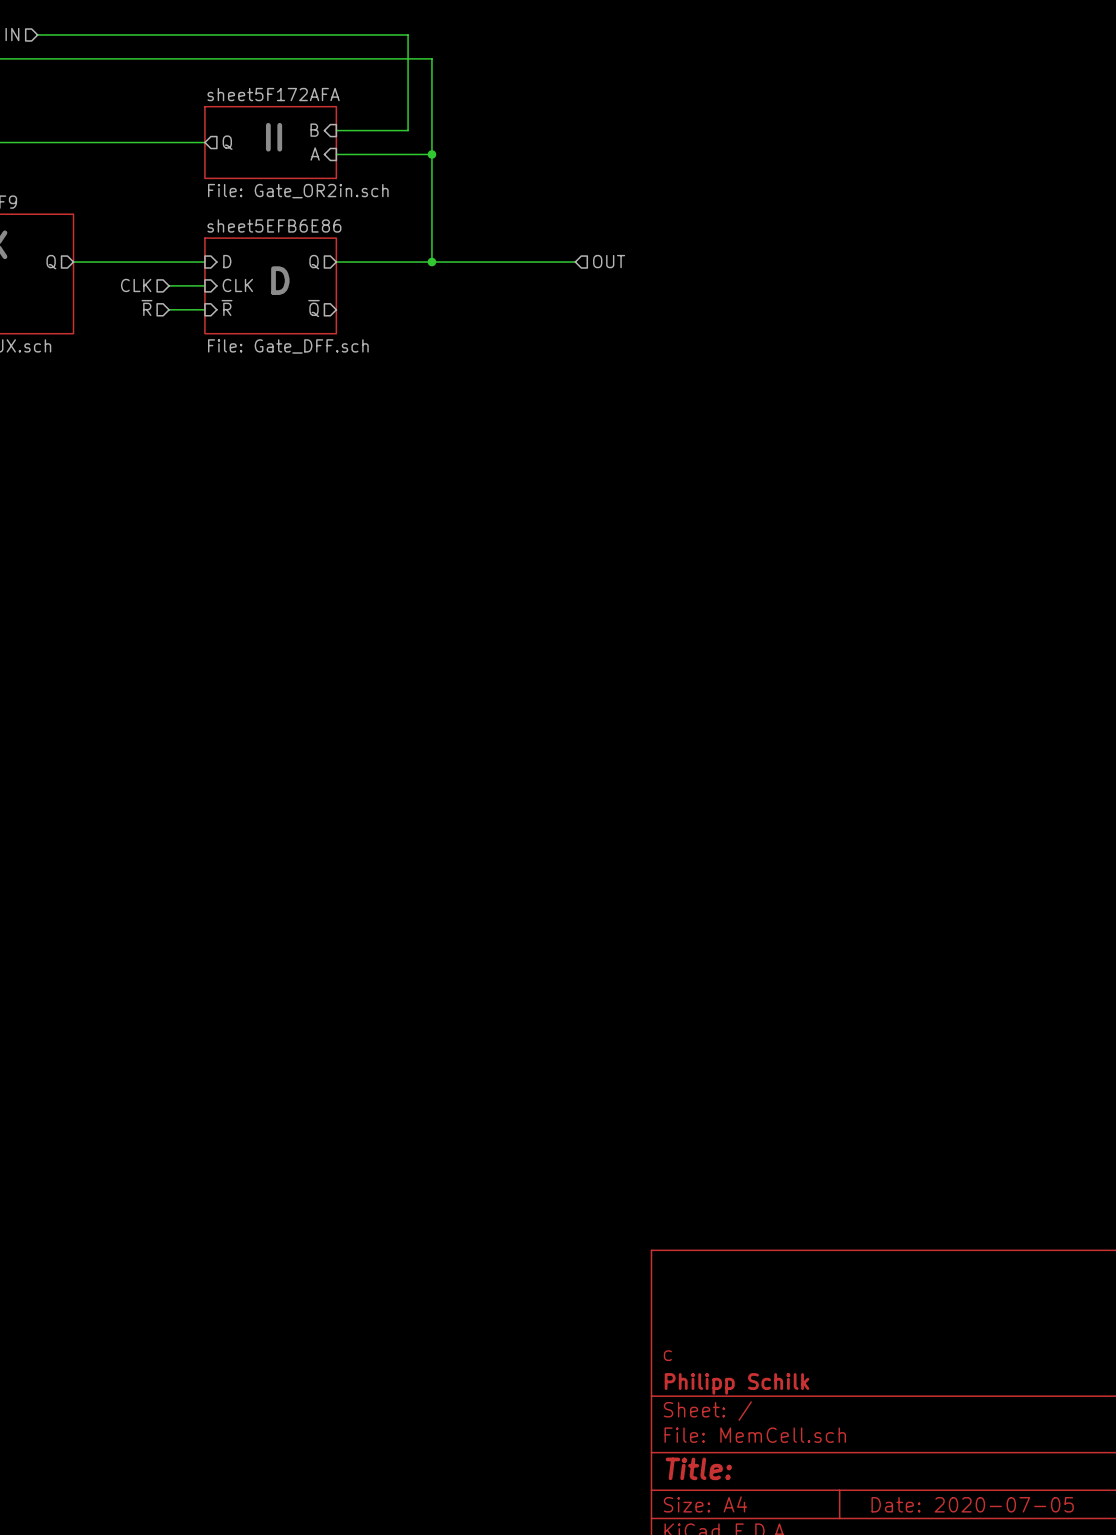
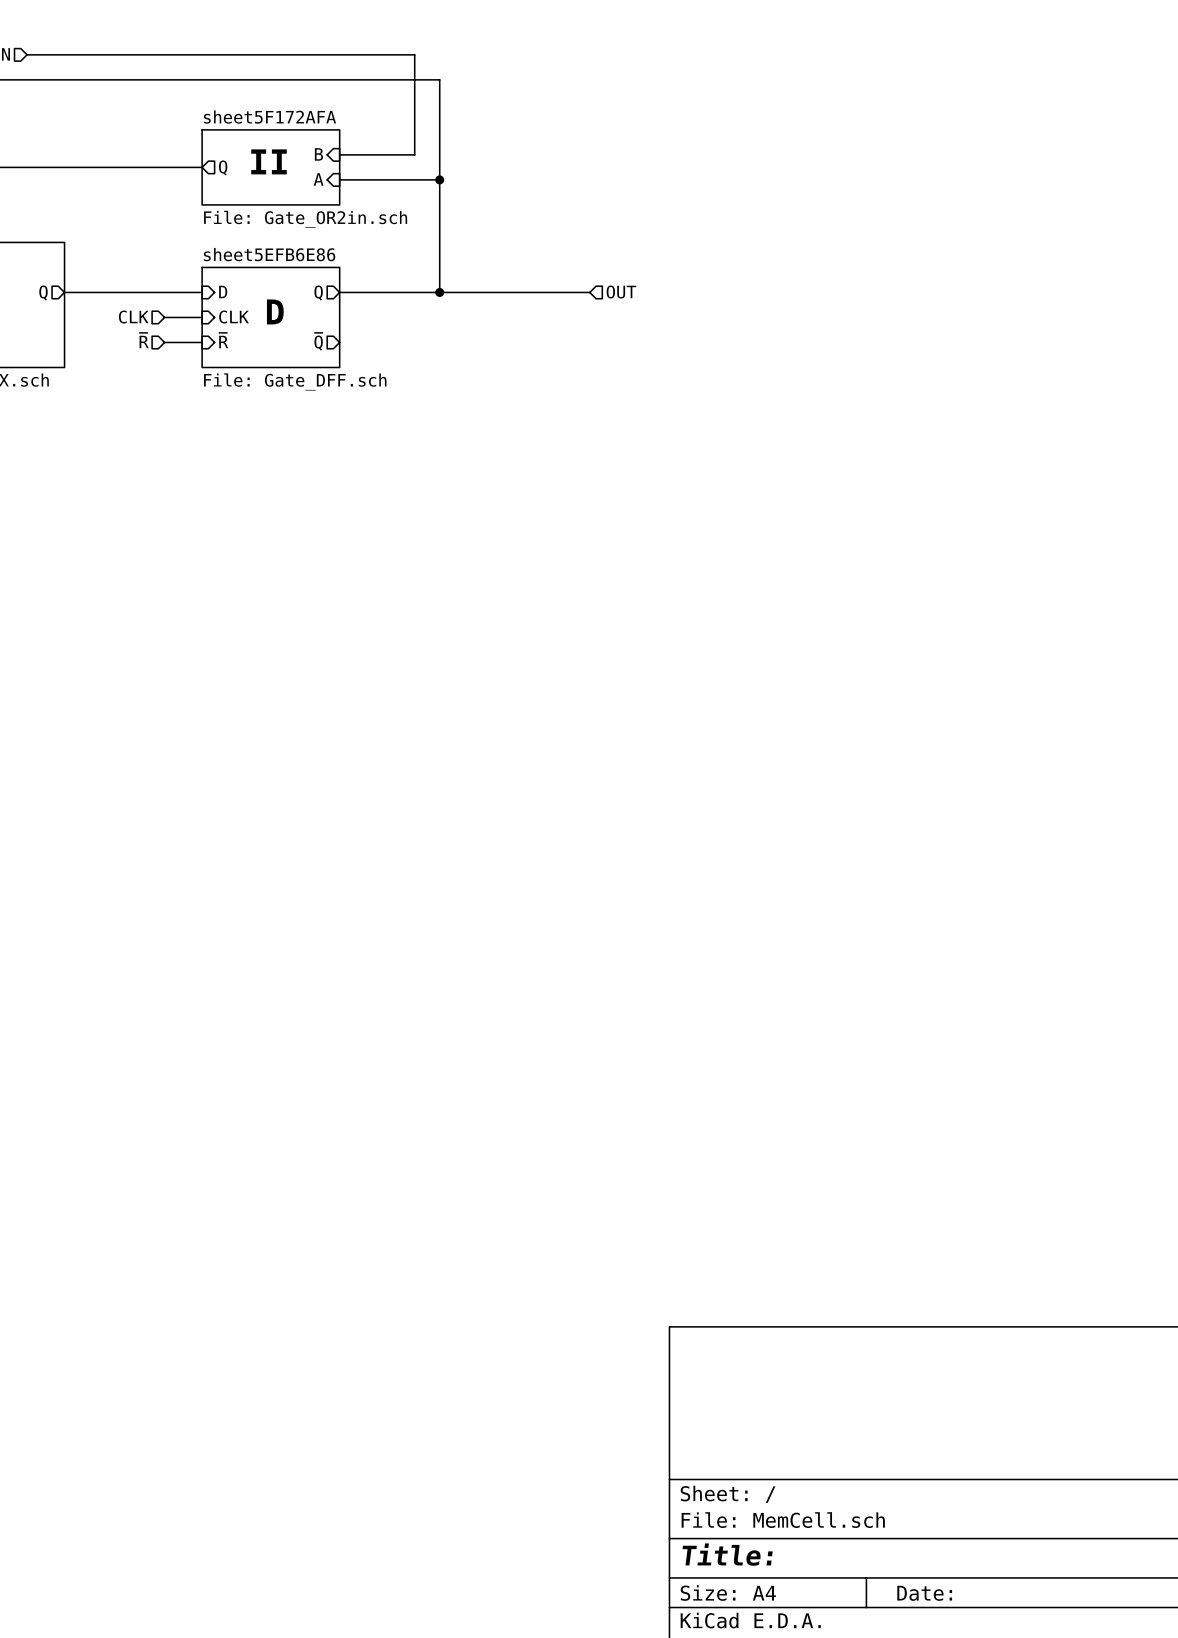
title block: c (667, 1355) -> none
title block: Philipp Schilk (737, 1383) -> none
title block: Date: 2020-07-05 (972, 1504) -> Date: (924, 1593)

